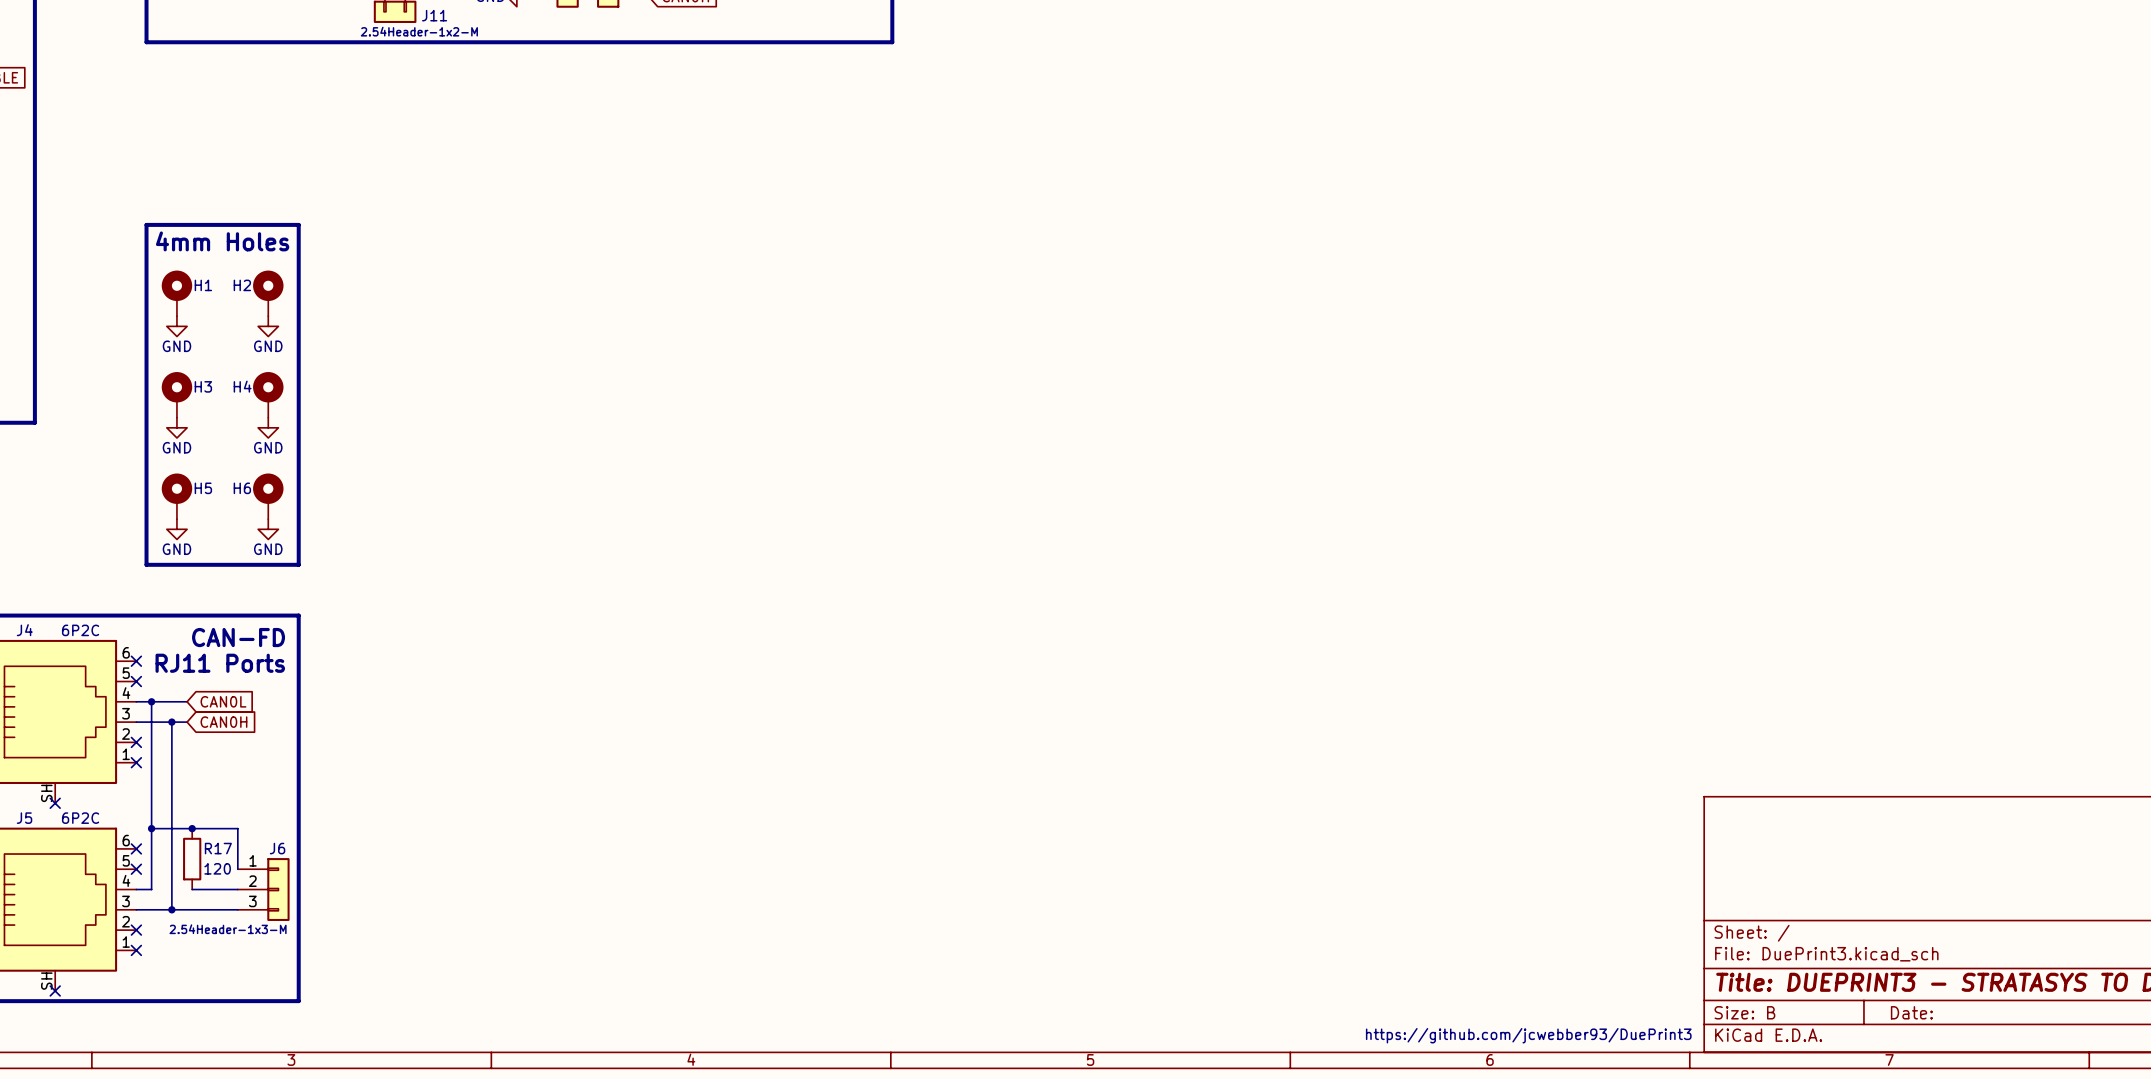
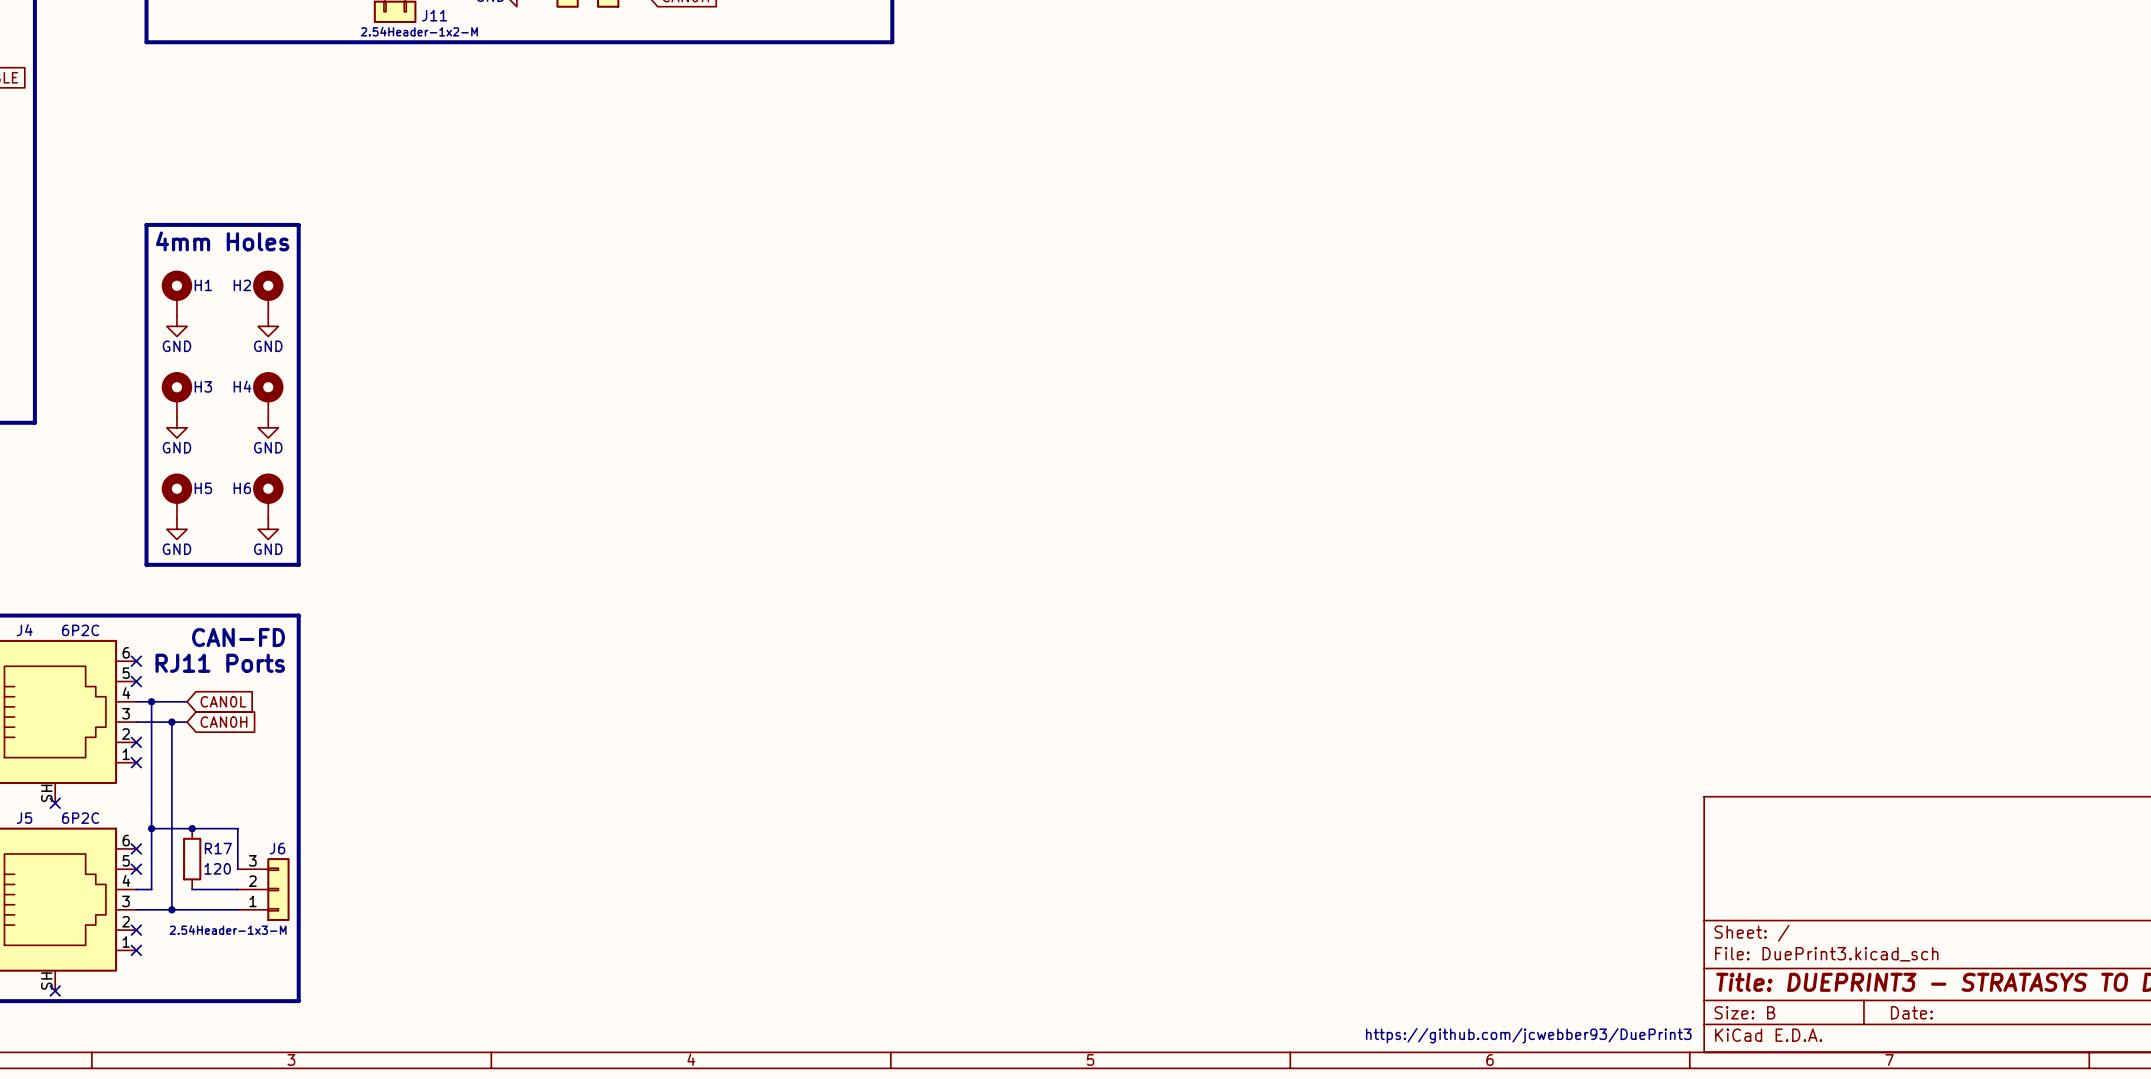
J6 flip: as is (278, 889) -> up-down (278, 889)

